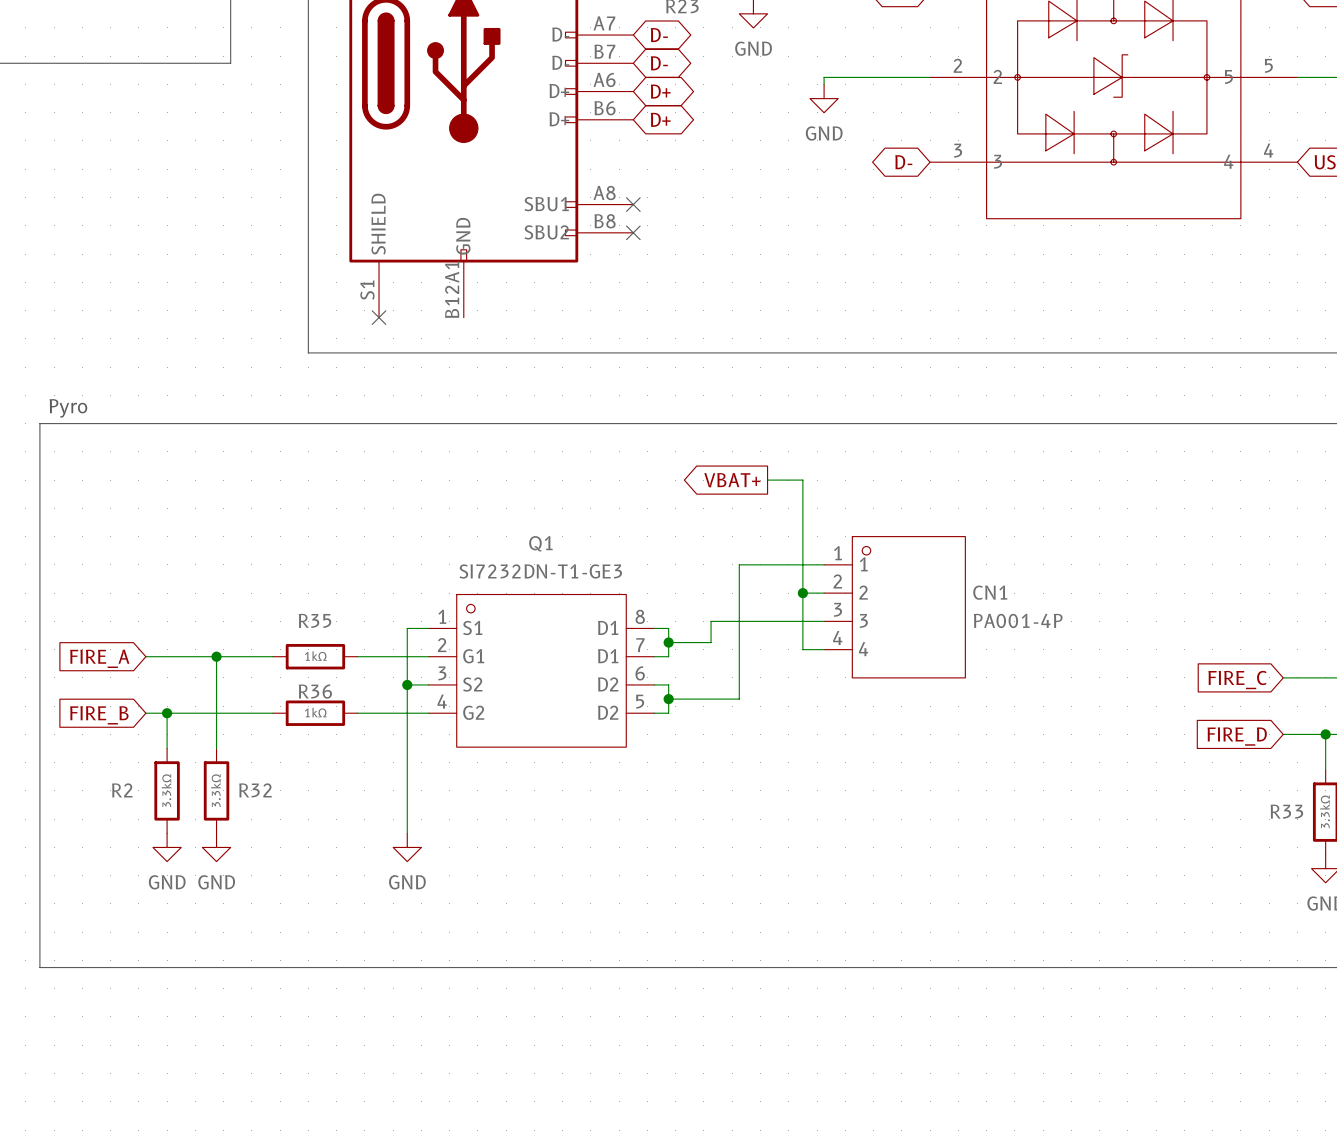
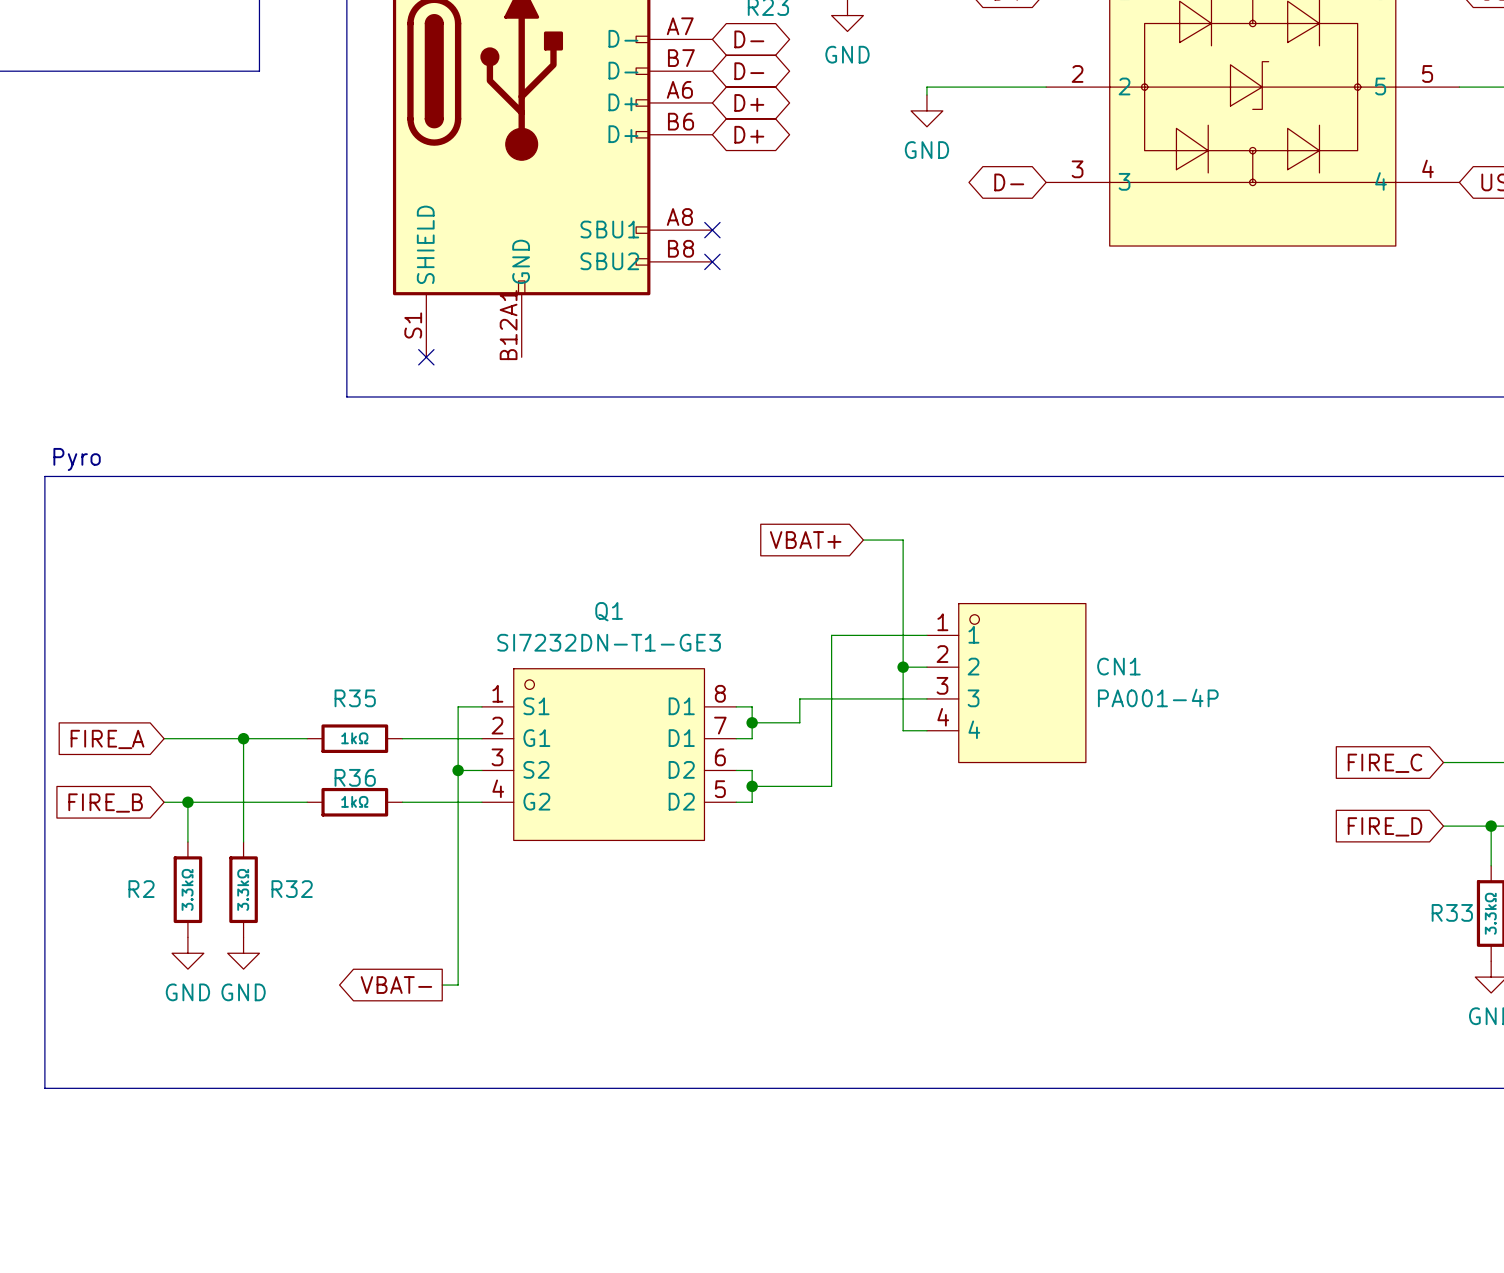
global label shape: output (732, 480) -> input (805, 540)
wire: none -> (458, 937) (458, 985) (442, 985)
power symbol: GND (407, 847) -> none
global label: none -> VBAT- (396, 985)

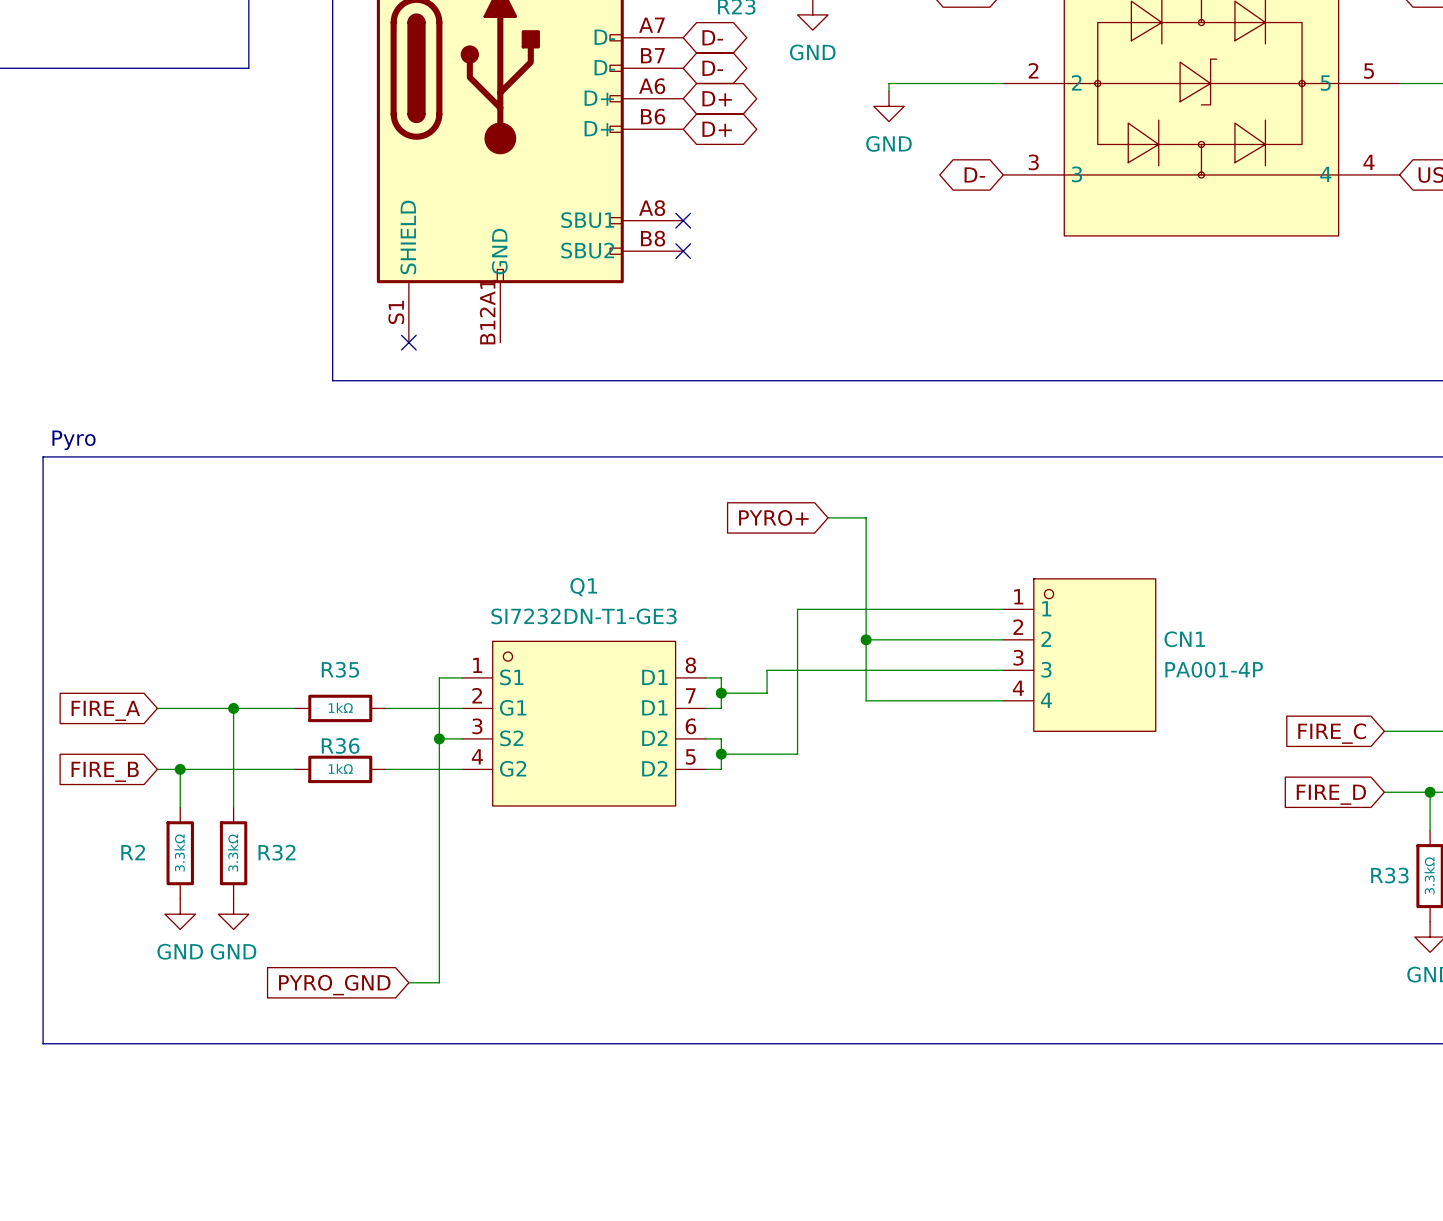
global label: VBAT+ (805, 540) -> PYRO+ (773, 517)
CN1 position: (1006, 683) -> (1079, 655)
global label: VBAT- (396, 985) -> none
wire: (442, 985) (458, 985) -> (408, 982) (439, 982) (439, 944)
global label: none -> PYRO_GND (334, 985)

